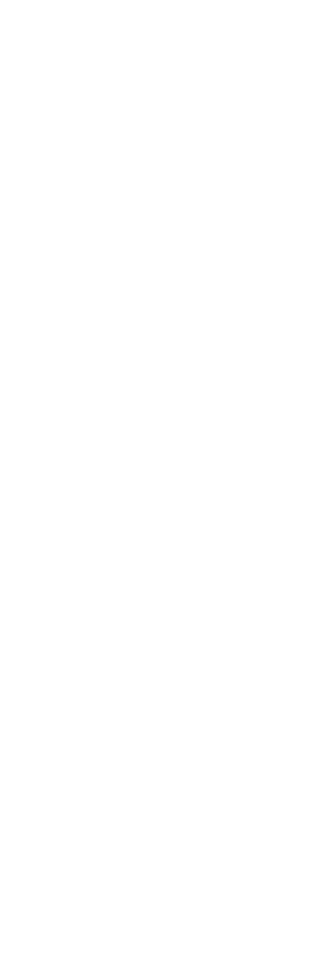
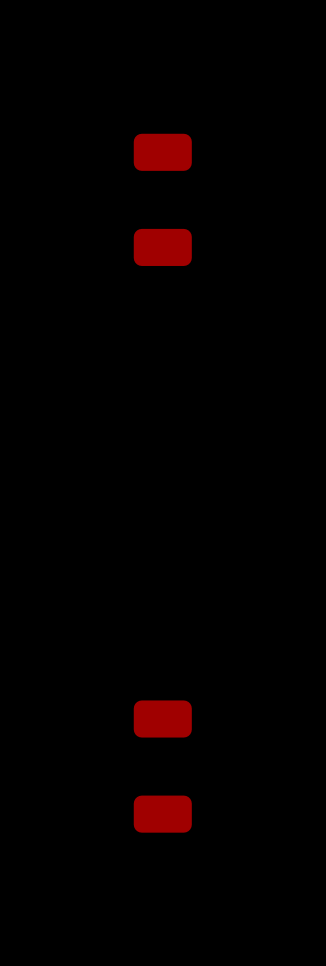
part: none -> (162, 199)
part: none -> (162, 766)

